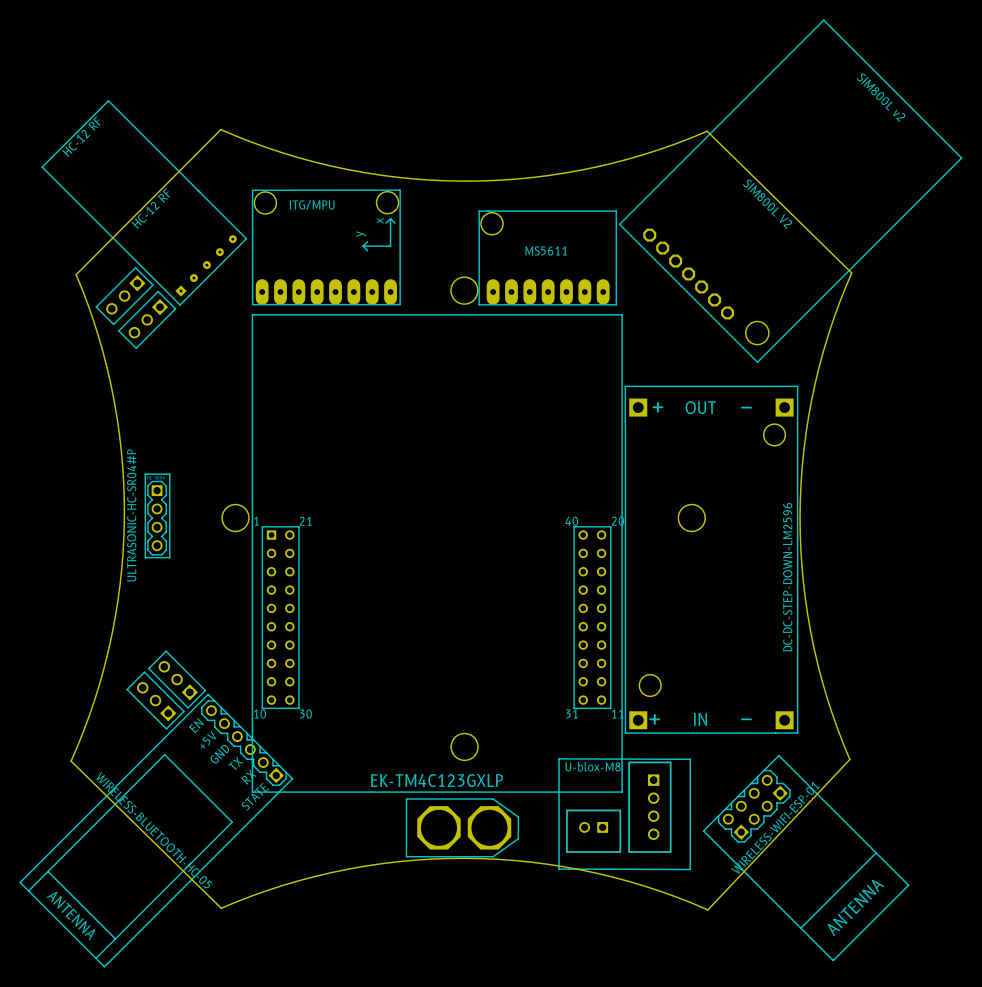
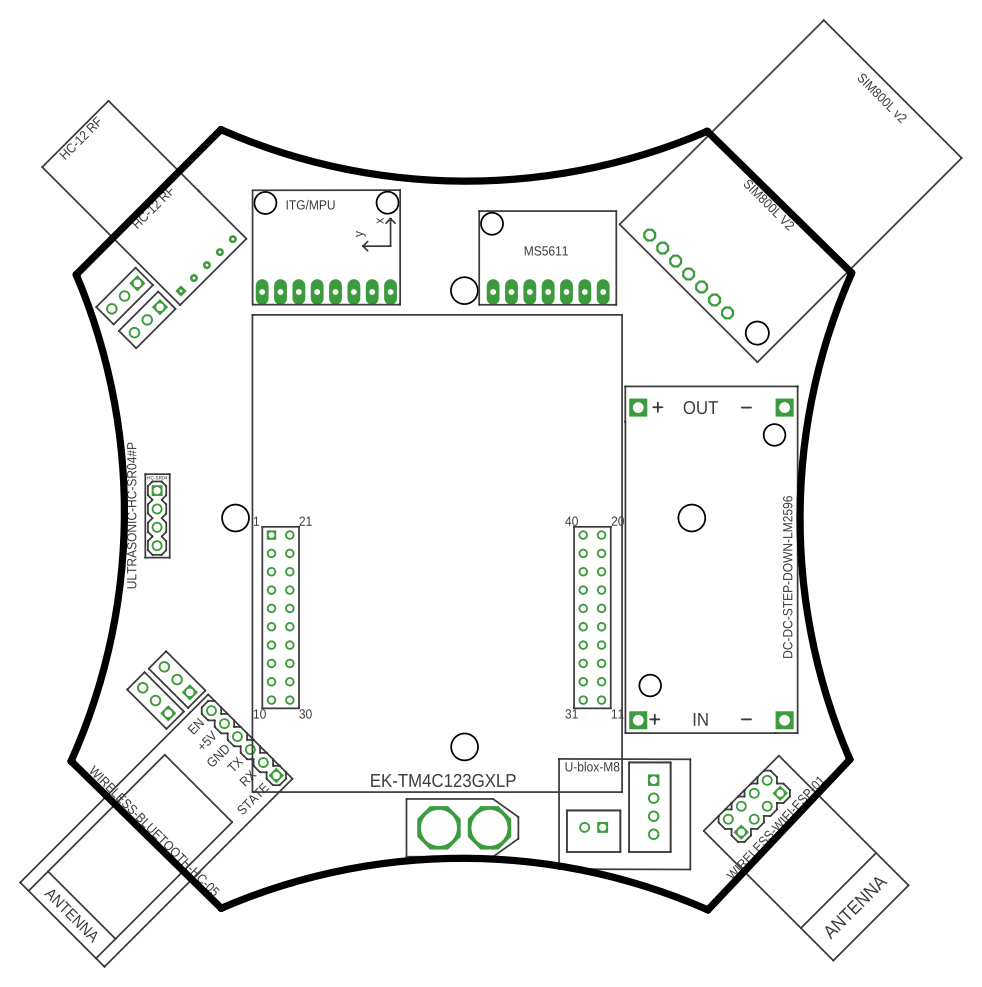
board edge width: thin (220, 129) (76, 274) (98, 337) (114, 402) (121, 451) (124, 518) (120, 585) (108, 650) (89, 714) (71, 761) (221, 908) (267, 890) (332, 872) (398, 861) (464, 858) (514, 860) (580, 869) (645, 886) (707, 909) (849, 759) (831, 712) (814, 648) (803, 582) (800, 516) (802, 466) (811, 400) (828, 335) (851, 273) (707, 131) (644, 154) (579, 170) (530, 177) (463, 181) (397, 177) (331, 166) (267, 147) (220, 129) -> thick (220, 129) (76, 274) (98, 337) (114, 402) (121, 451) (124, 518) (120, 585) (108, 650) (89, 714) (71, 761) (221, 908) (267, 890) (332, 872) (398, 861) (464, 858) (514, 860) (580, 869) (645, 886) (707, 909) (849, 759) (831, 712) (814, 648) (803, 582) (800, 516) (802, 466) (811, 400) (828, 335) (851, 273) (707, 131) (644, 154) (579, 170) (530, 177) (463, 181) (397, 177) (331, 166) (267, 147) (220, 129)

